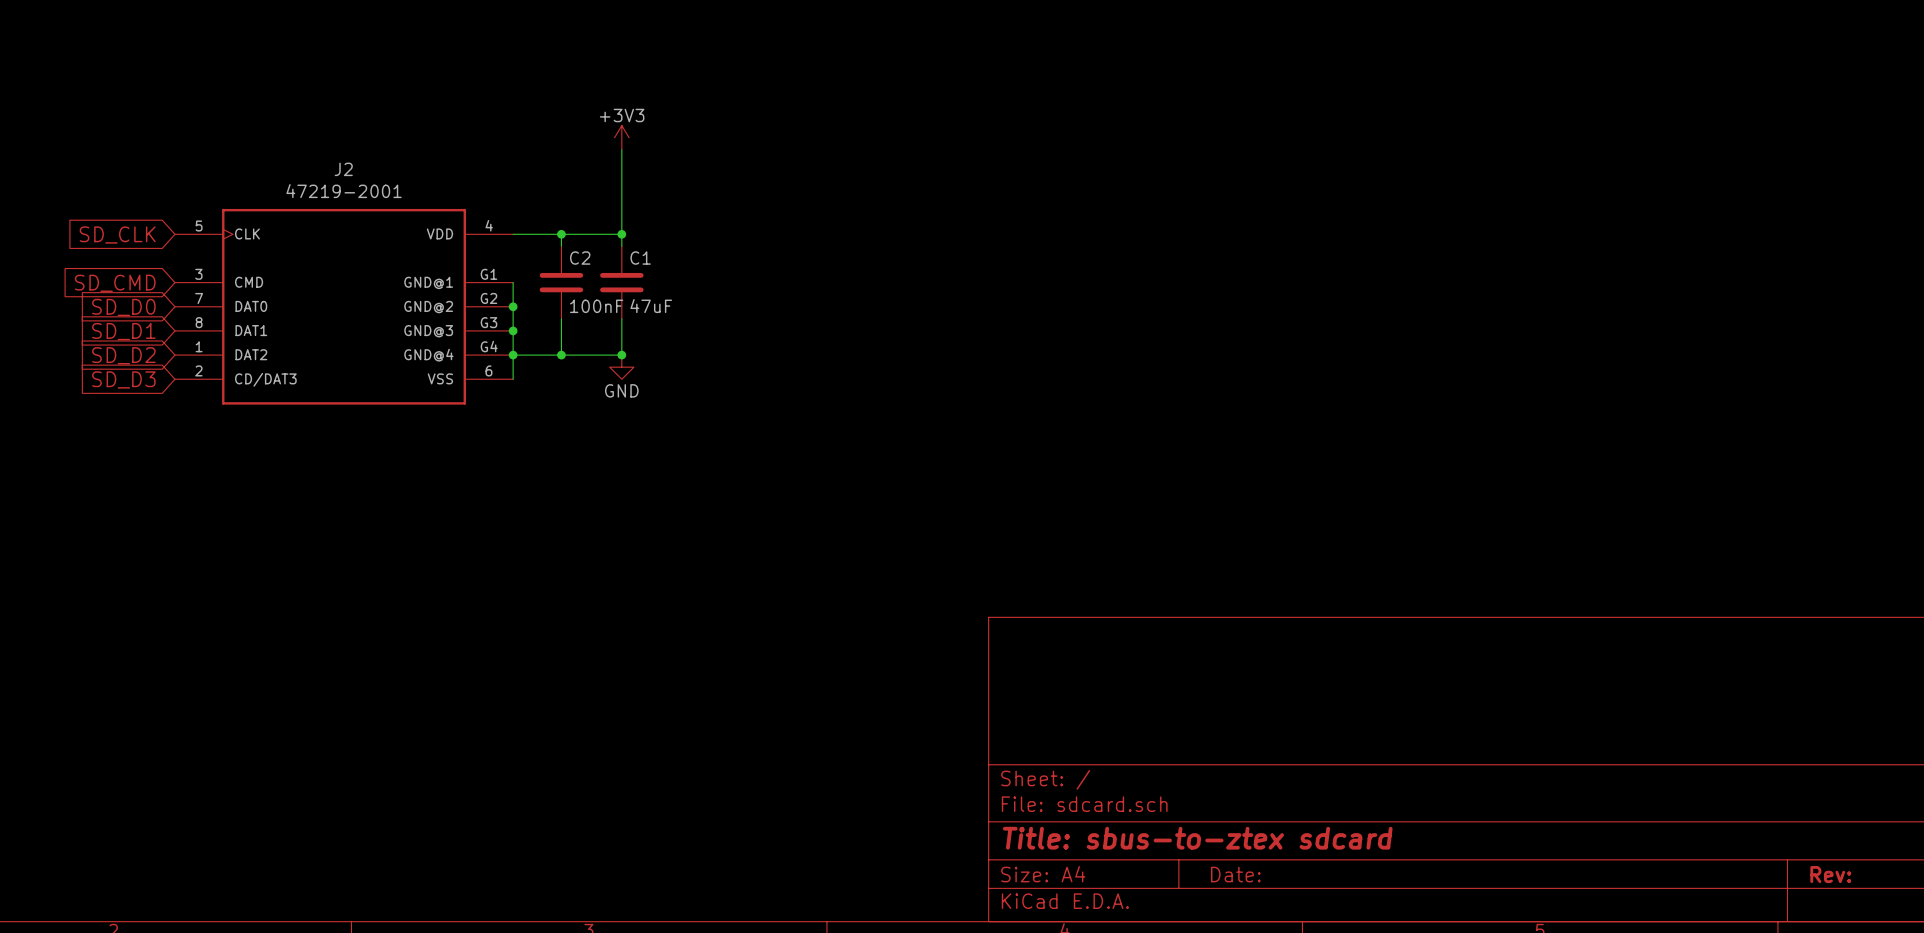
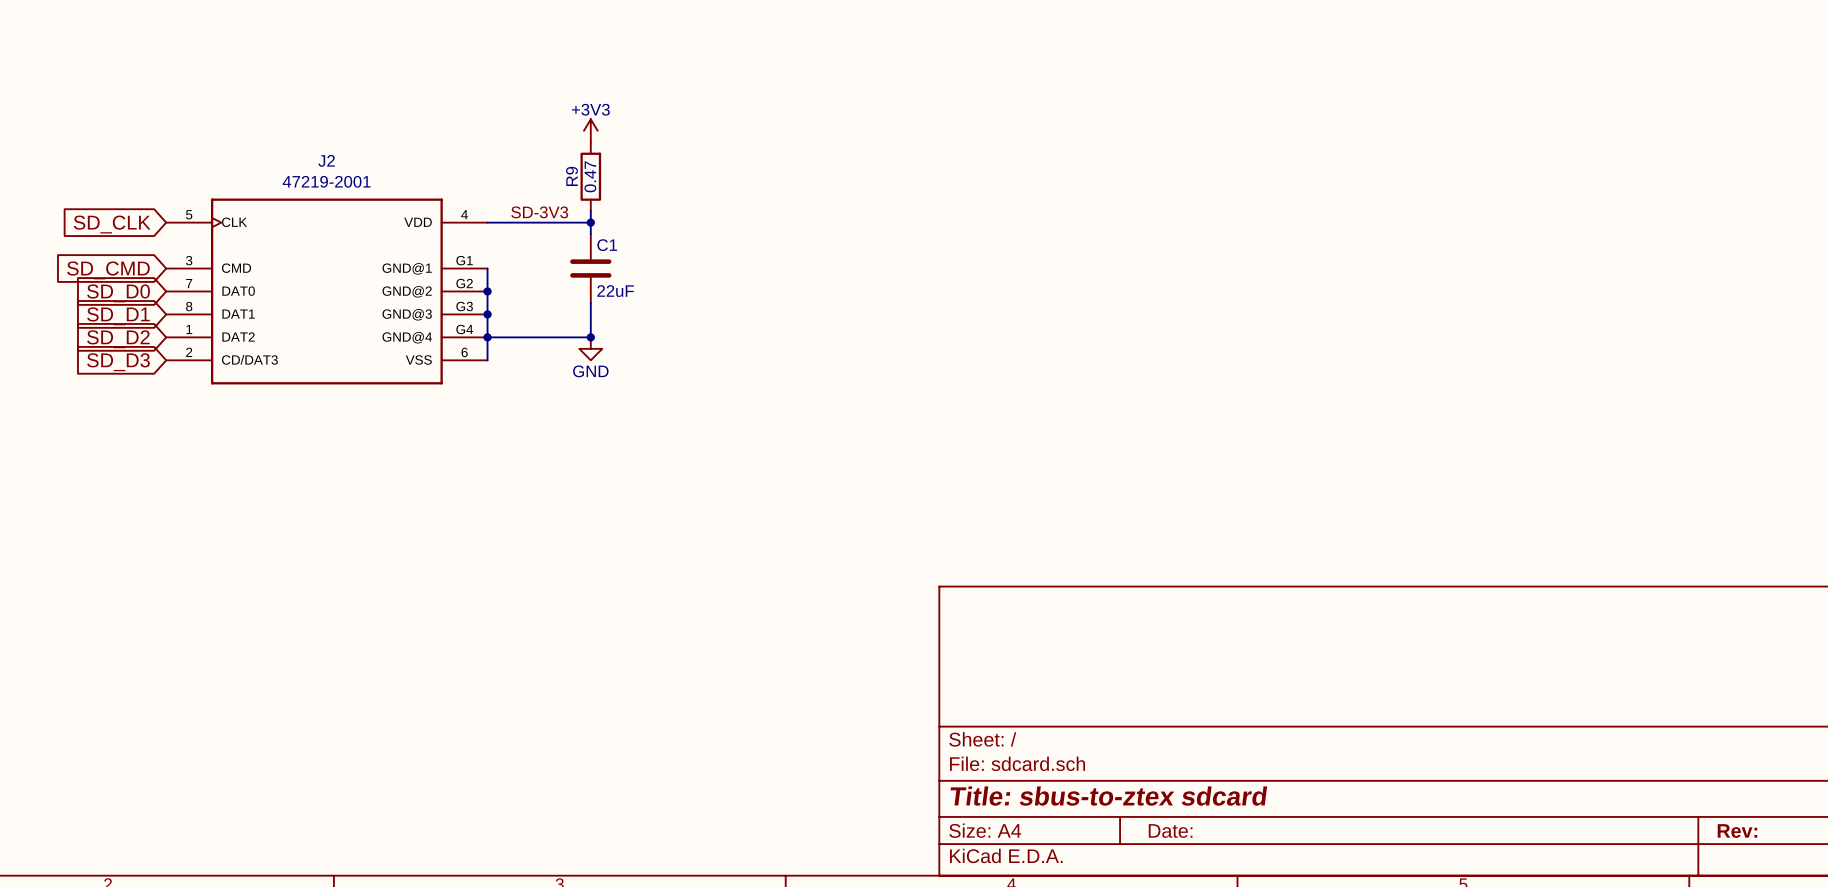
wire: (621, 149) (621, 222) -> none
R9: none -> 0.47 (590, 176)
label: none -> SD-3V3 (539, 212)
wire: (561, 234) (561, 246) -> none
junction: (561, 234) -> none
C2: 100nF (561, 282) -> none
C1 value: 47uF (651, 306) -> 22uF (615, 291)
wire: (561, 318) (561, 355) -> none
junction: (561, 355) -> none

